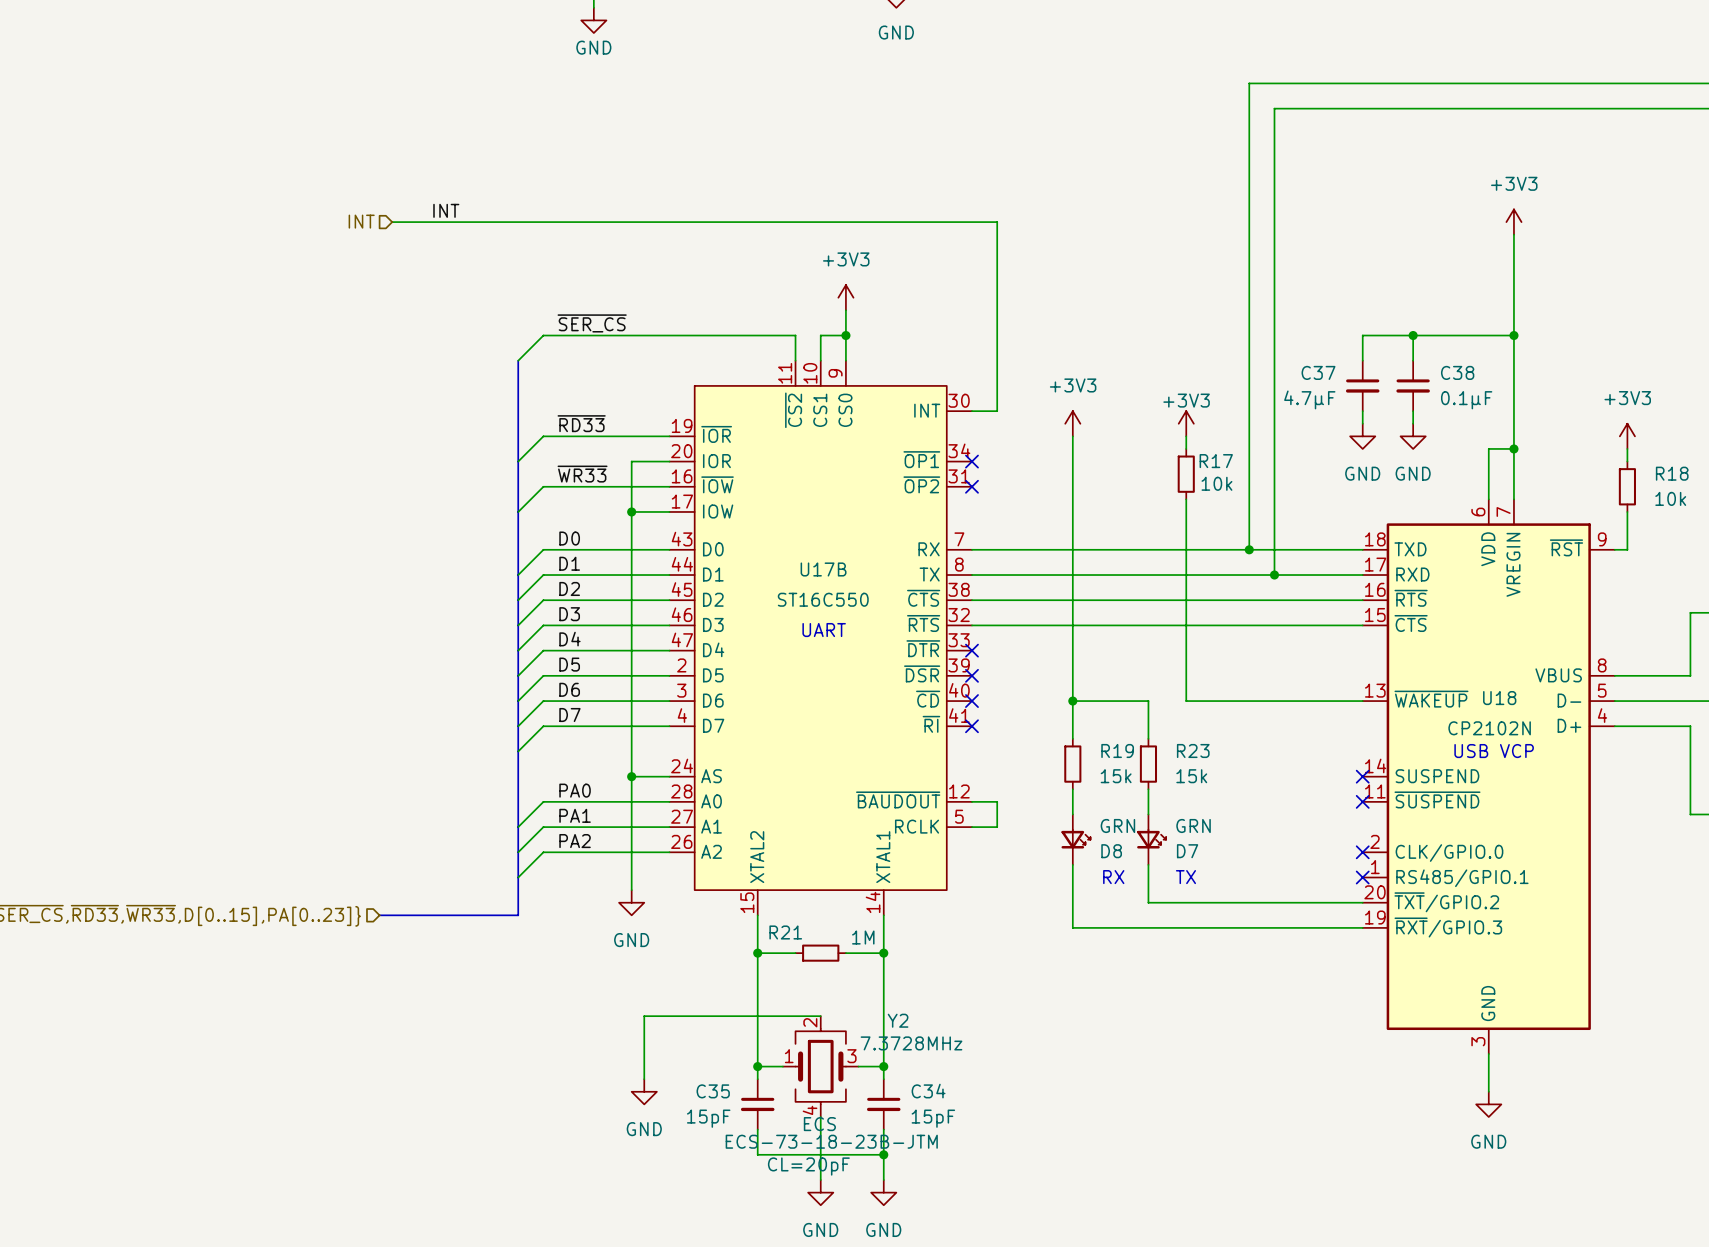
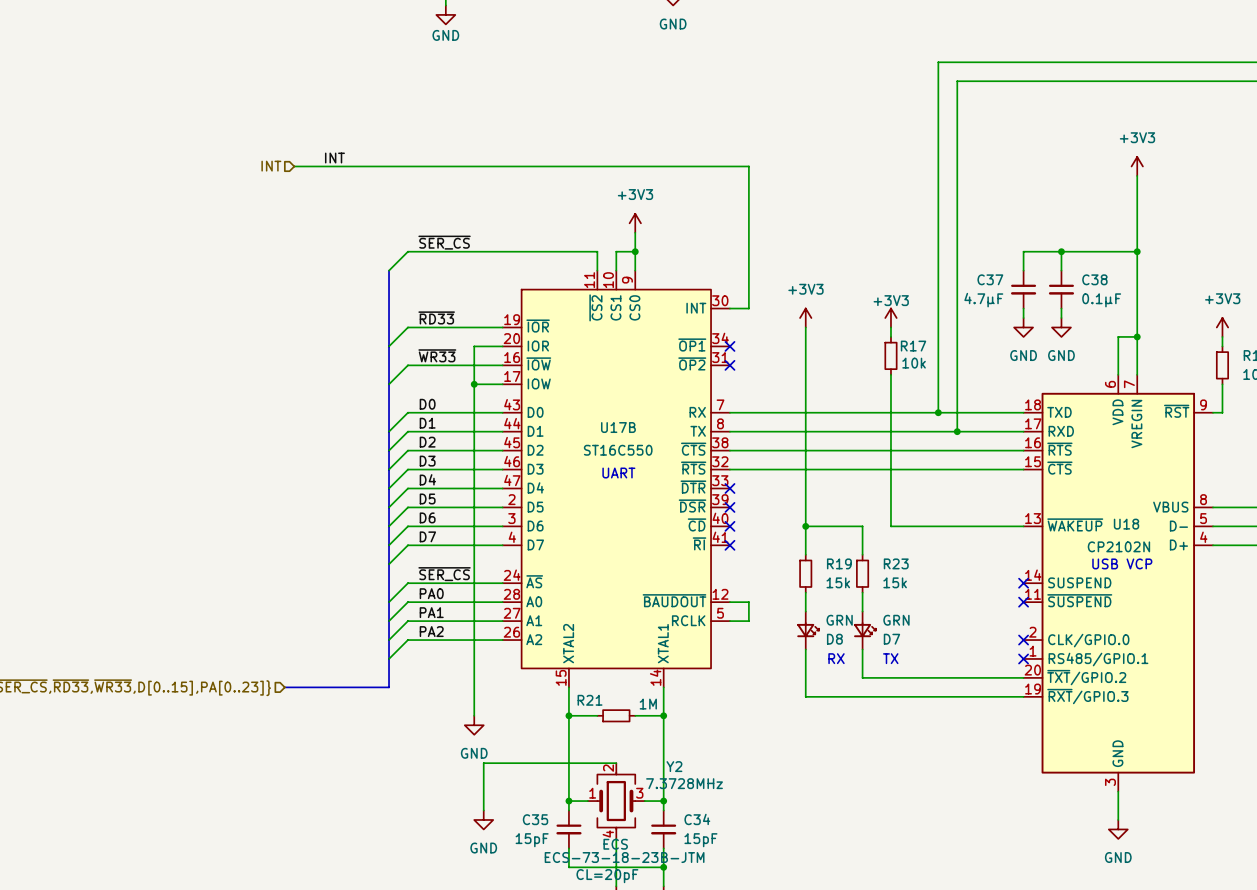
label: none -> ~{SER_CS} (444, 574)
wire: none -> (474, 583) (407, 583) (389, 602)
junction: (631, 776) -> none
U17B pin name: AS (711, 776) -> ~{AS} (534, 581)
wire: none -> (474, 668) (474, 715)
power symbol position: GND (631, 902) -> GND (474, 725)

